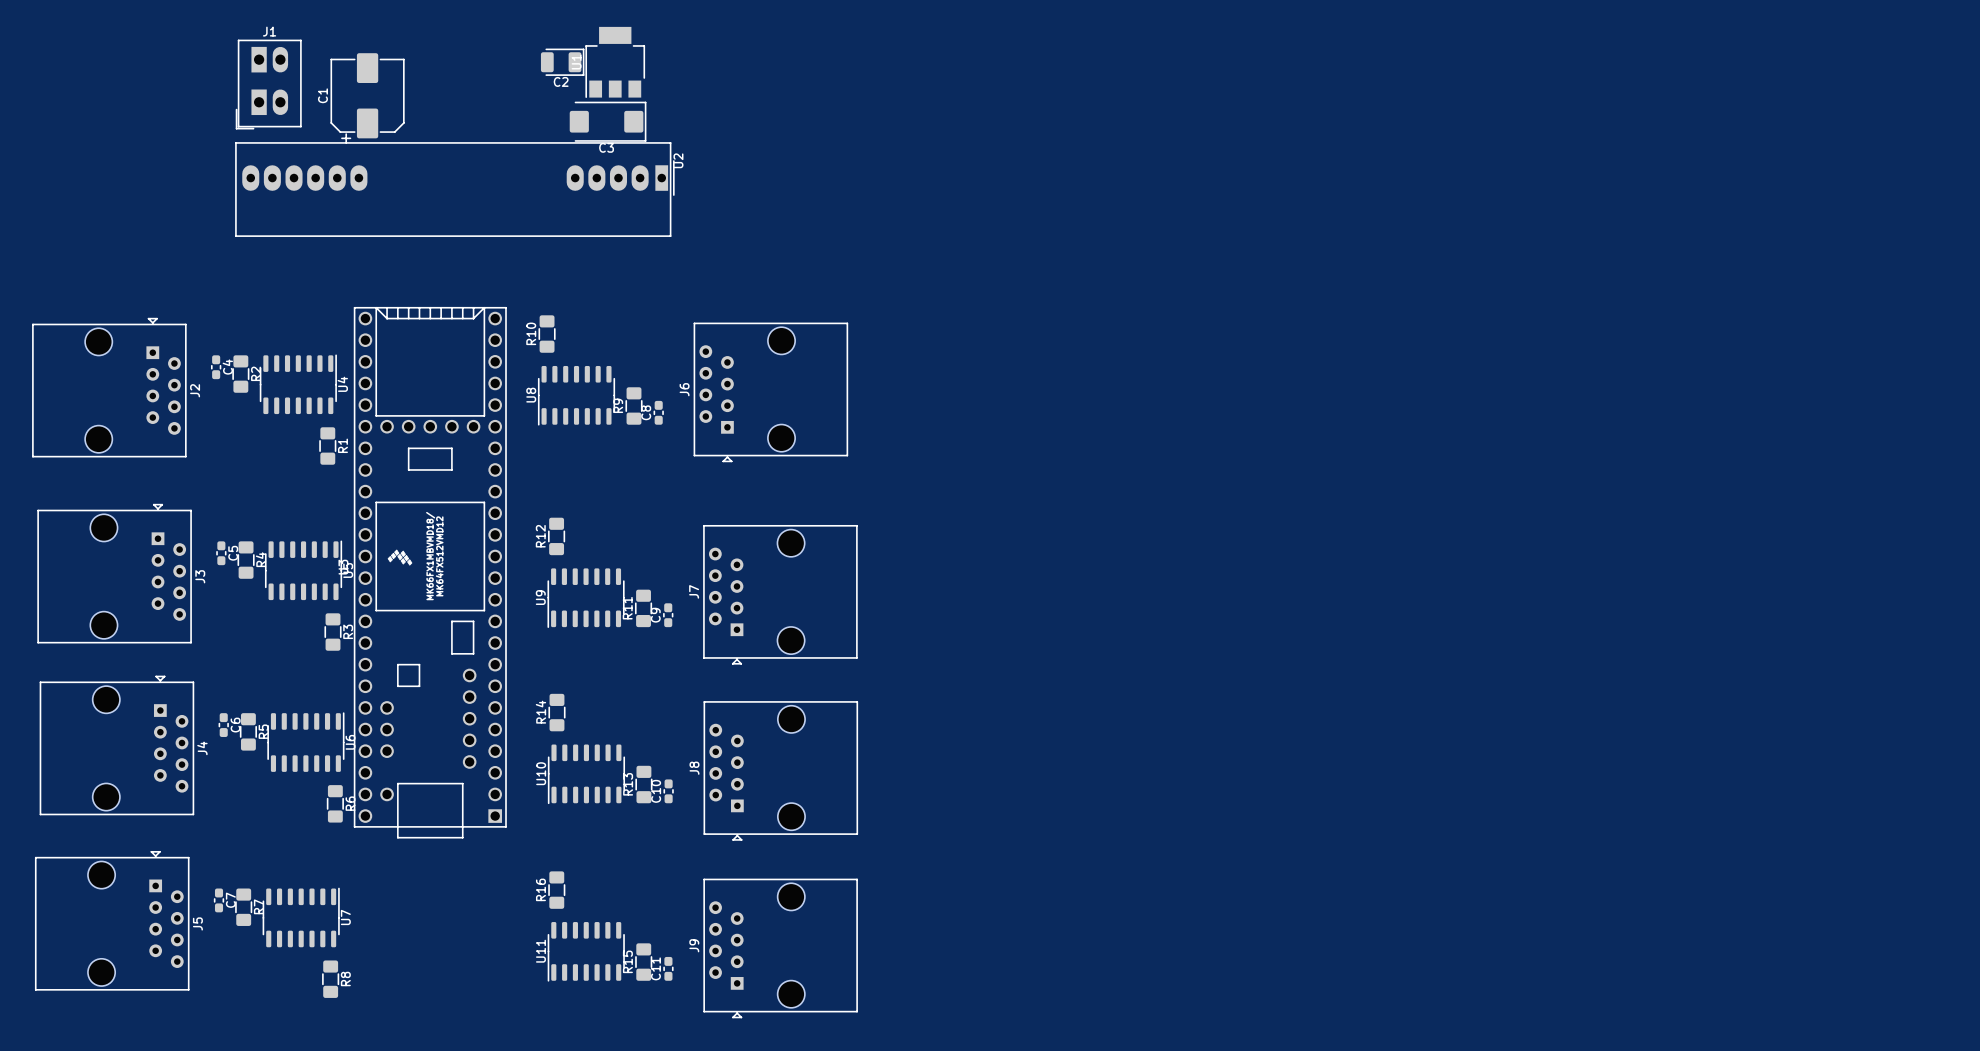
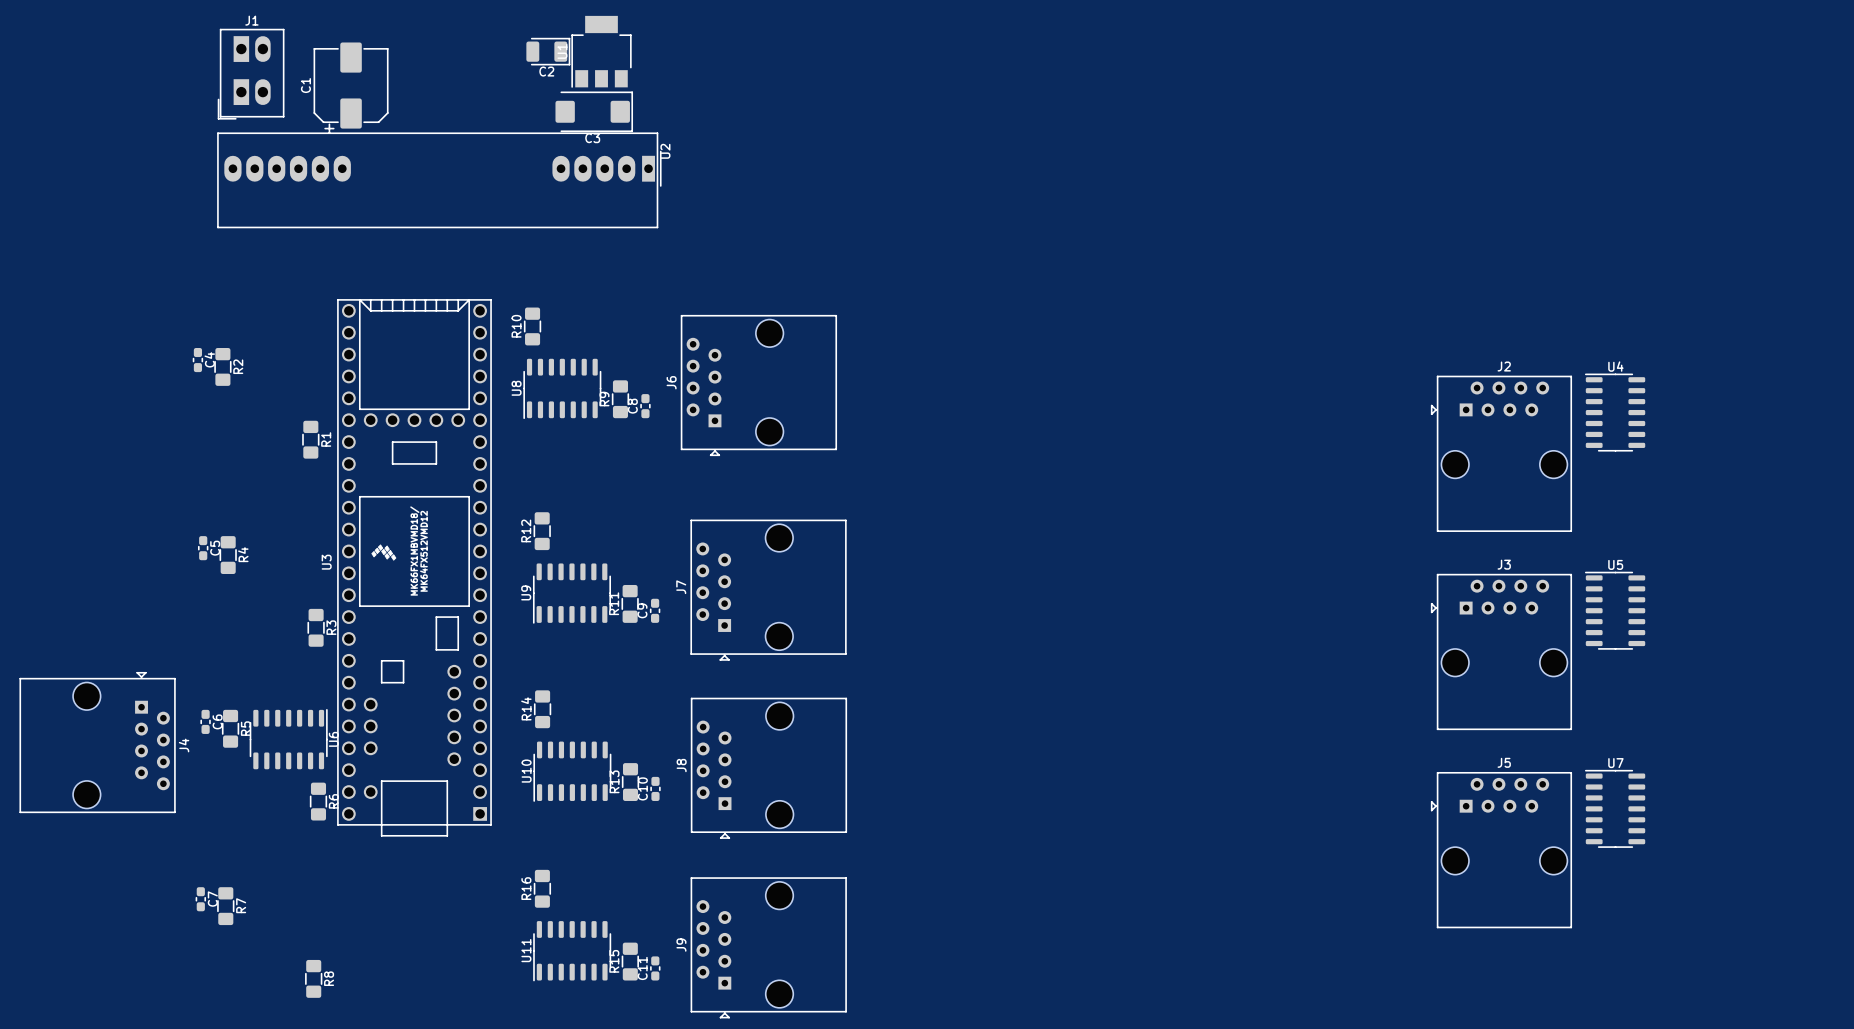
U4 rotation: 0° (298, 384) -> 90° counterclockwise (1615, 412)
U4 position: (298, 384) -> (1615, 412)
J2 rotation: 0° (109, 387) -> 90° counterclockwise (1501, 453)
J2 position: (109, 387) -> (1501, 453)
U5 rotation: 0° (303, 570) -> 90° counterclockwise (1615, 610)
U5 position: (303, 570) -> (1615, 610)
J3 rotation: 0° (114, 573) -> 90° counterclockwise (1501, 651)
J3 position: (114, 573) -> (1501, 651)
U7 rotation: 0° (301, 917) -> 90° counterclockwise (1615, 808)
U7 position: (301, 917) -> (1615, 808)
J5 rotation: 0° (112, 920) -> 90° counterclockwise (1501, 850)
J5 position: (112, 920) -> (1501, 850)

